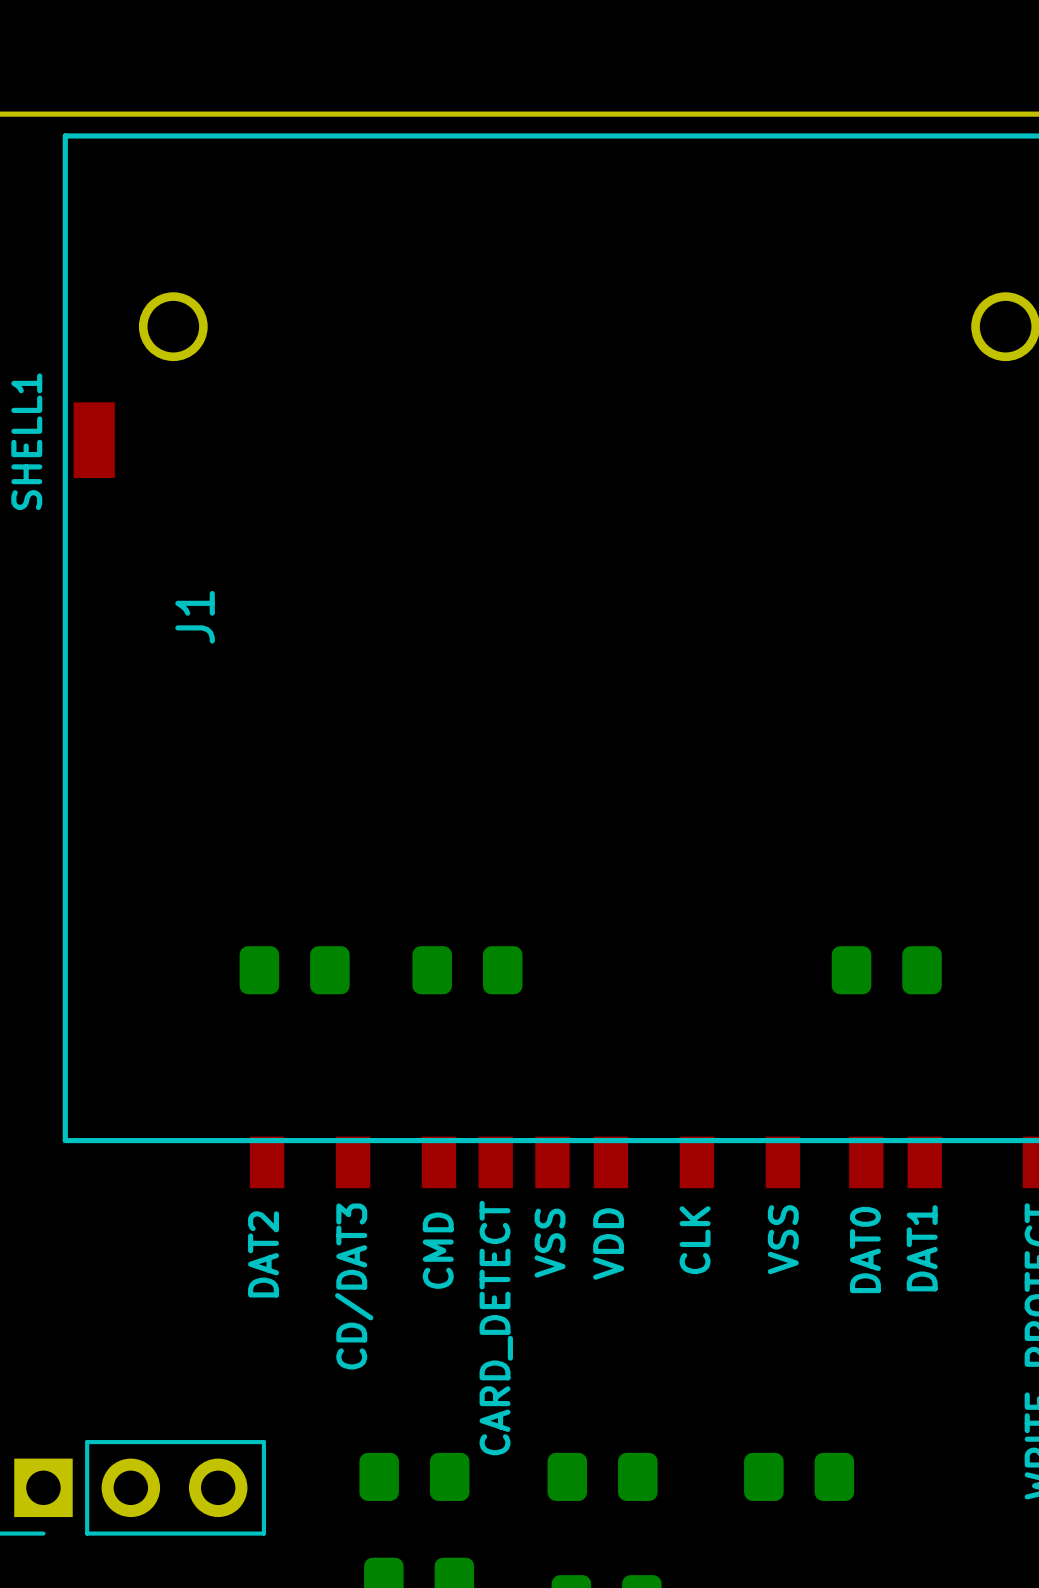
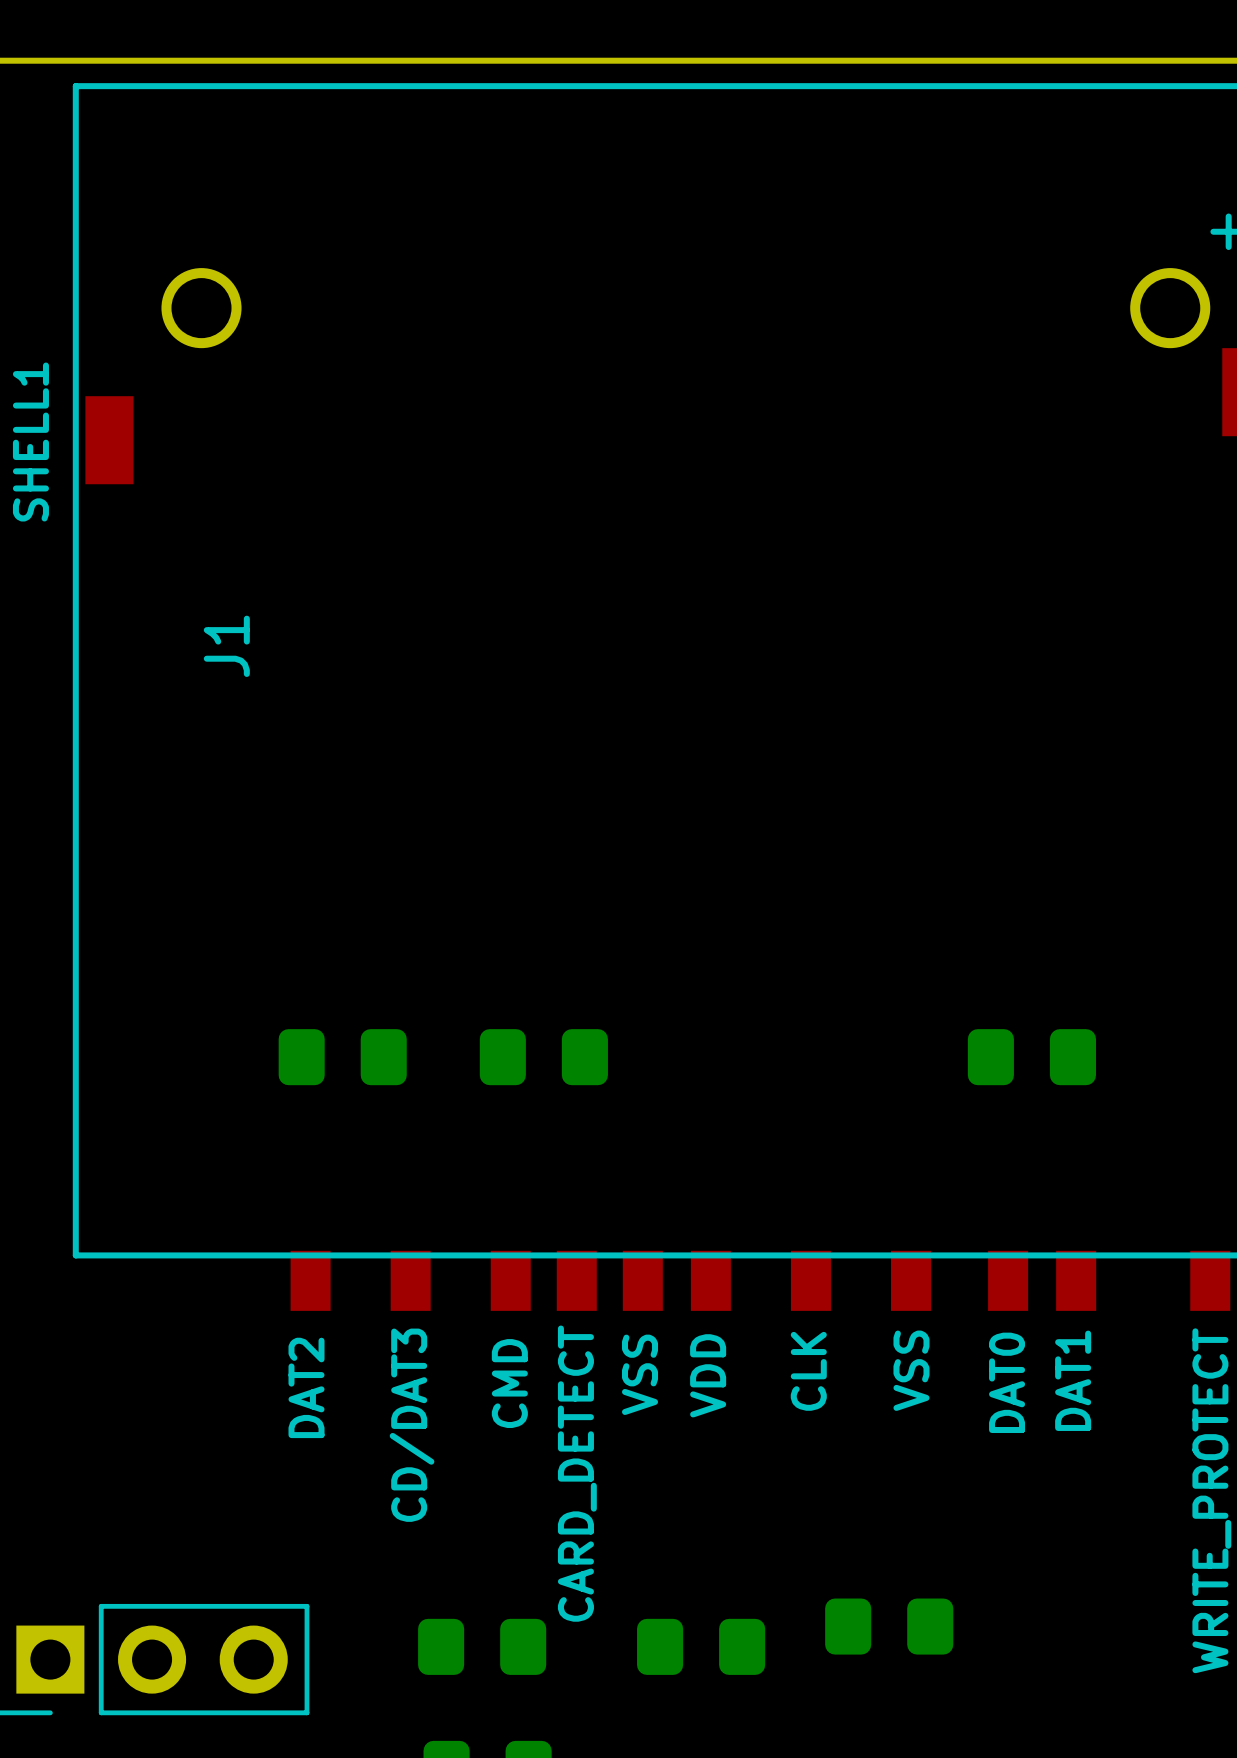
part position: (799, 1476) -> (889, 1626)

